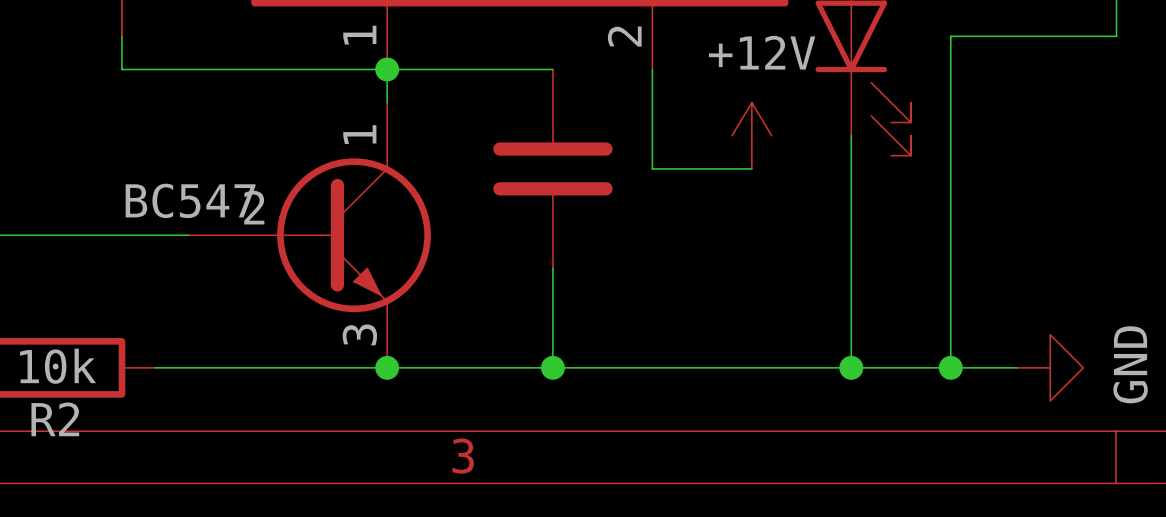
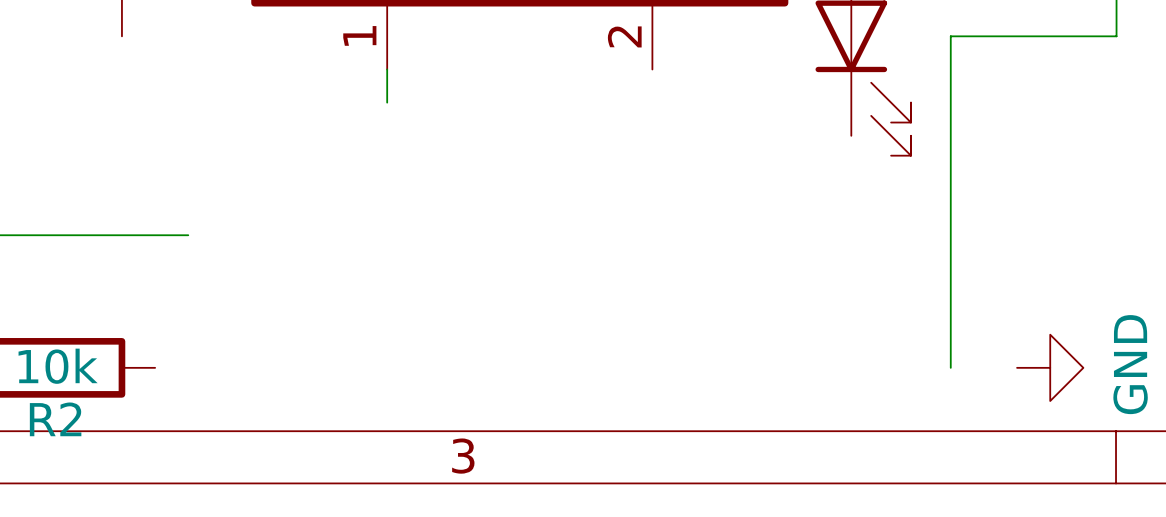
wire: (121, 36) (121, 69) (552, 69) -> none
junction: (387, 69) -> none
wire: (652, 69) (652, 168) (751, 168) -> none
power symbol: +12V (751, 135) -> none
wire: (851, 135) (851, 367) -> none
part: (552, 168) -> none
part: BC547 (309, 235) -> none
wire: (552, 268) (552, 367) -> none
wire: (155, 367) (1017, 367) -> none
junction: (387, 367) -> none
junction: (552, 367) -> none
junction: (851, 367) -> none
junction: (950, 367) -> none

